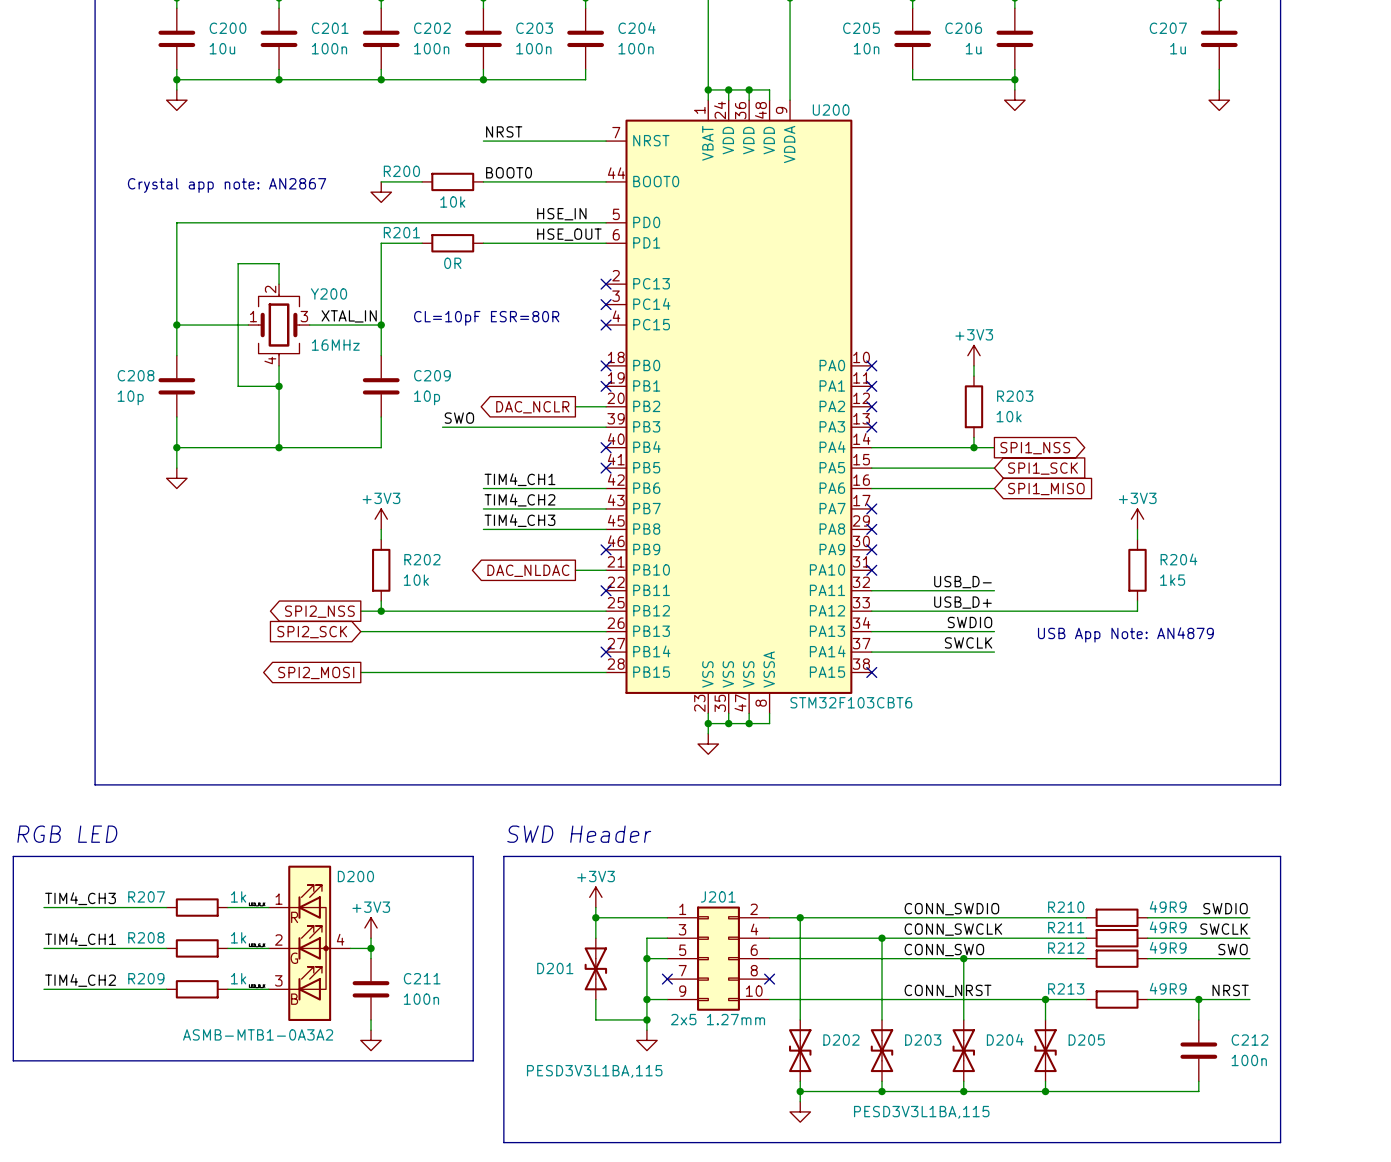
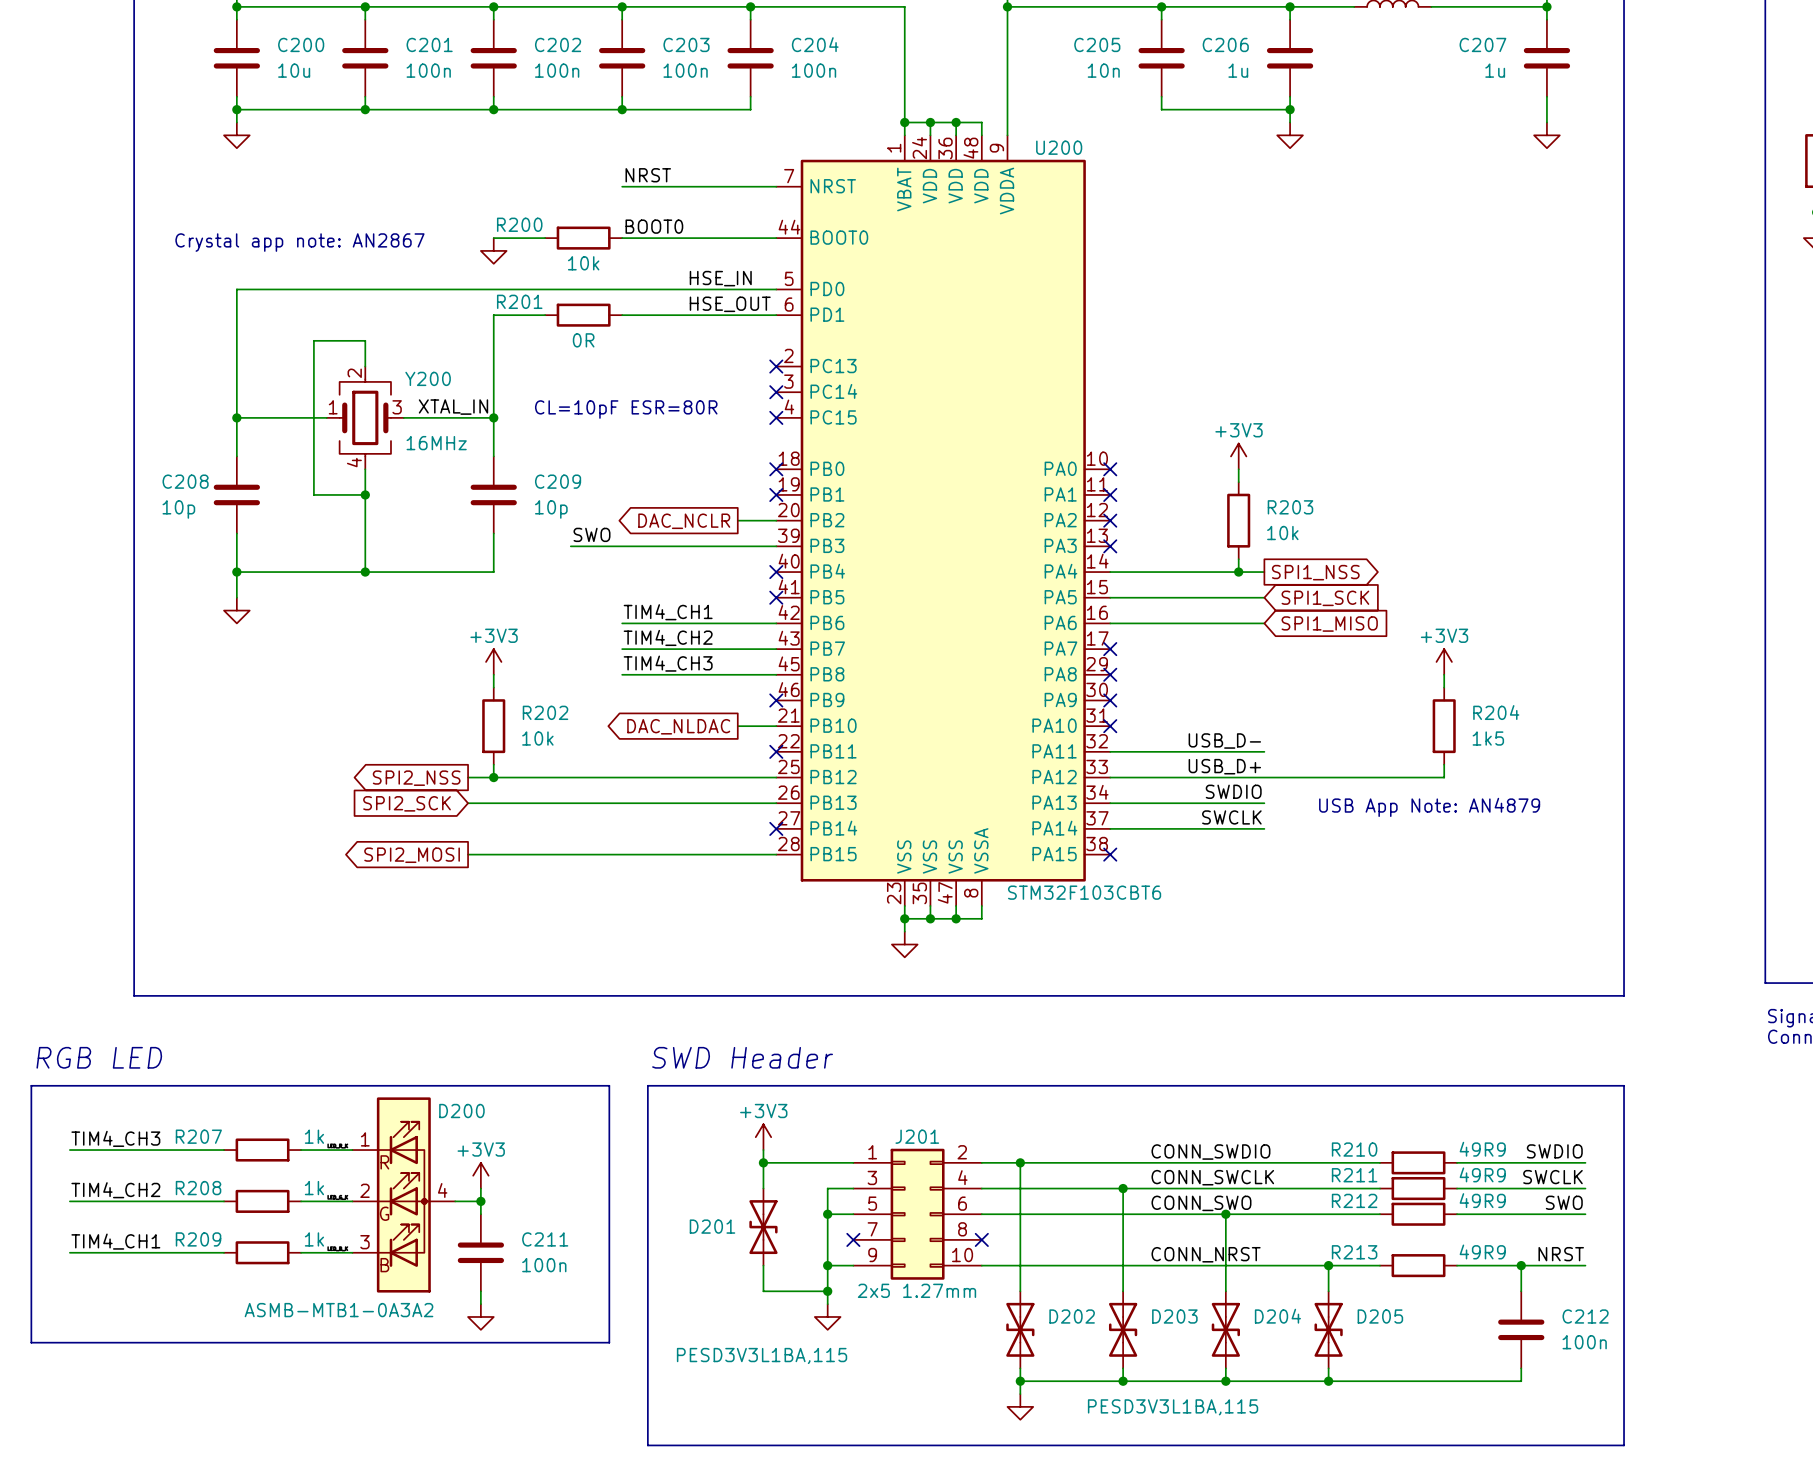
label: TIM4_CH1 (80, 939) -> TIM4_CH2 (115, 1190)
label: TIM4_CH2 (80, 980) -> TIM4_CH1 (115, 1241)

